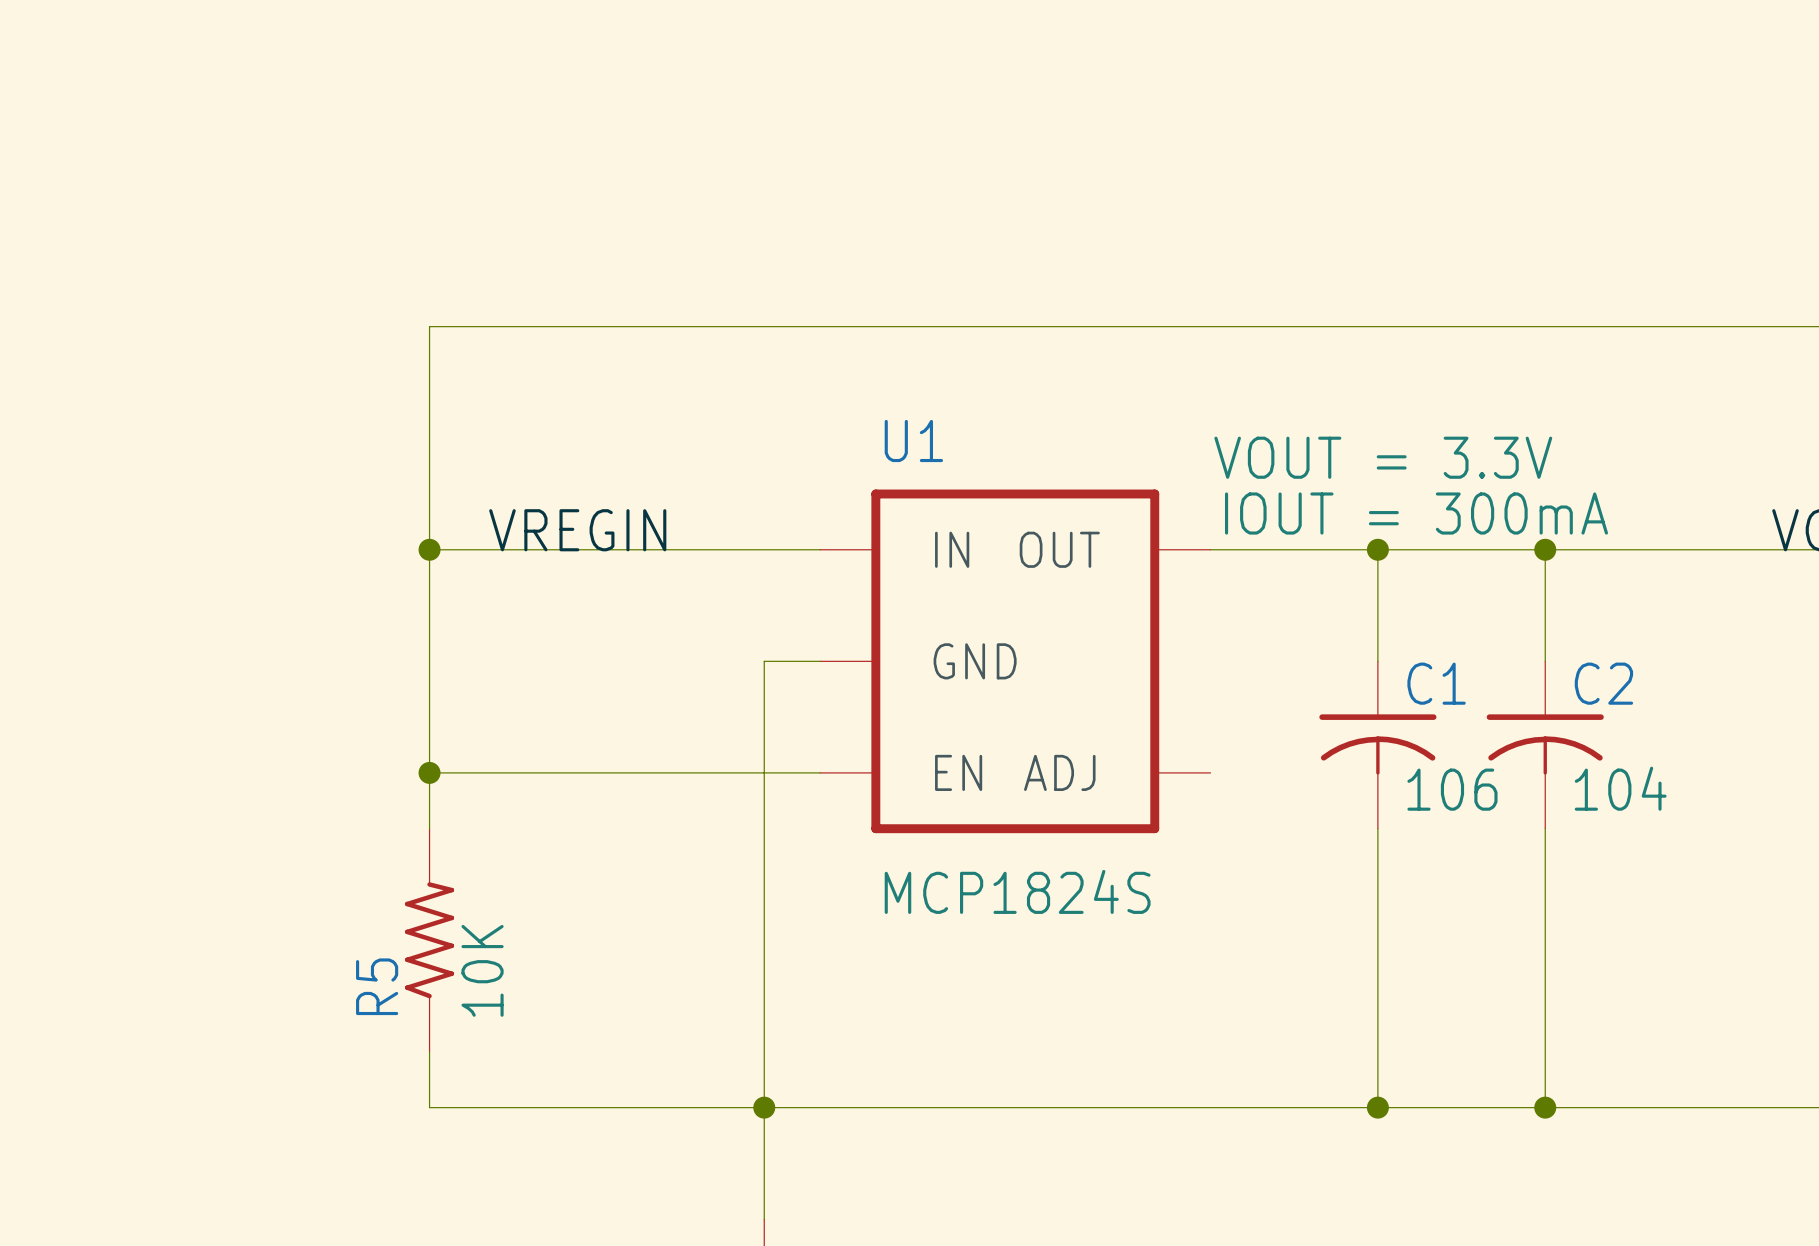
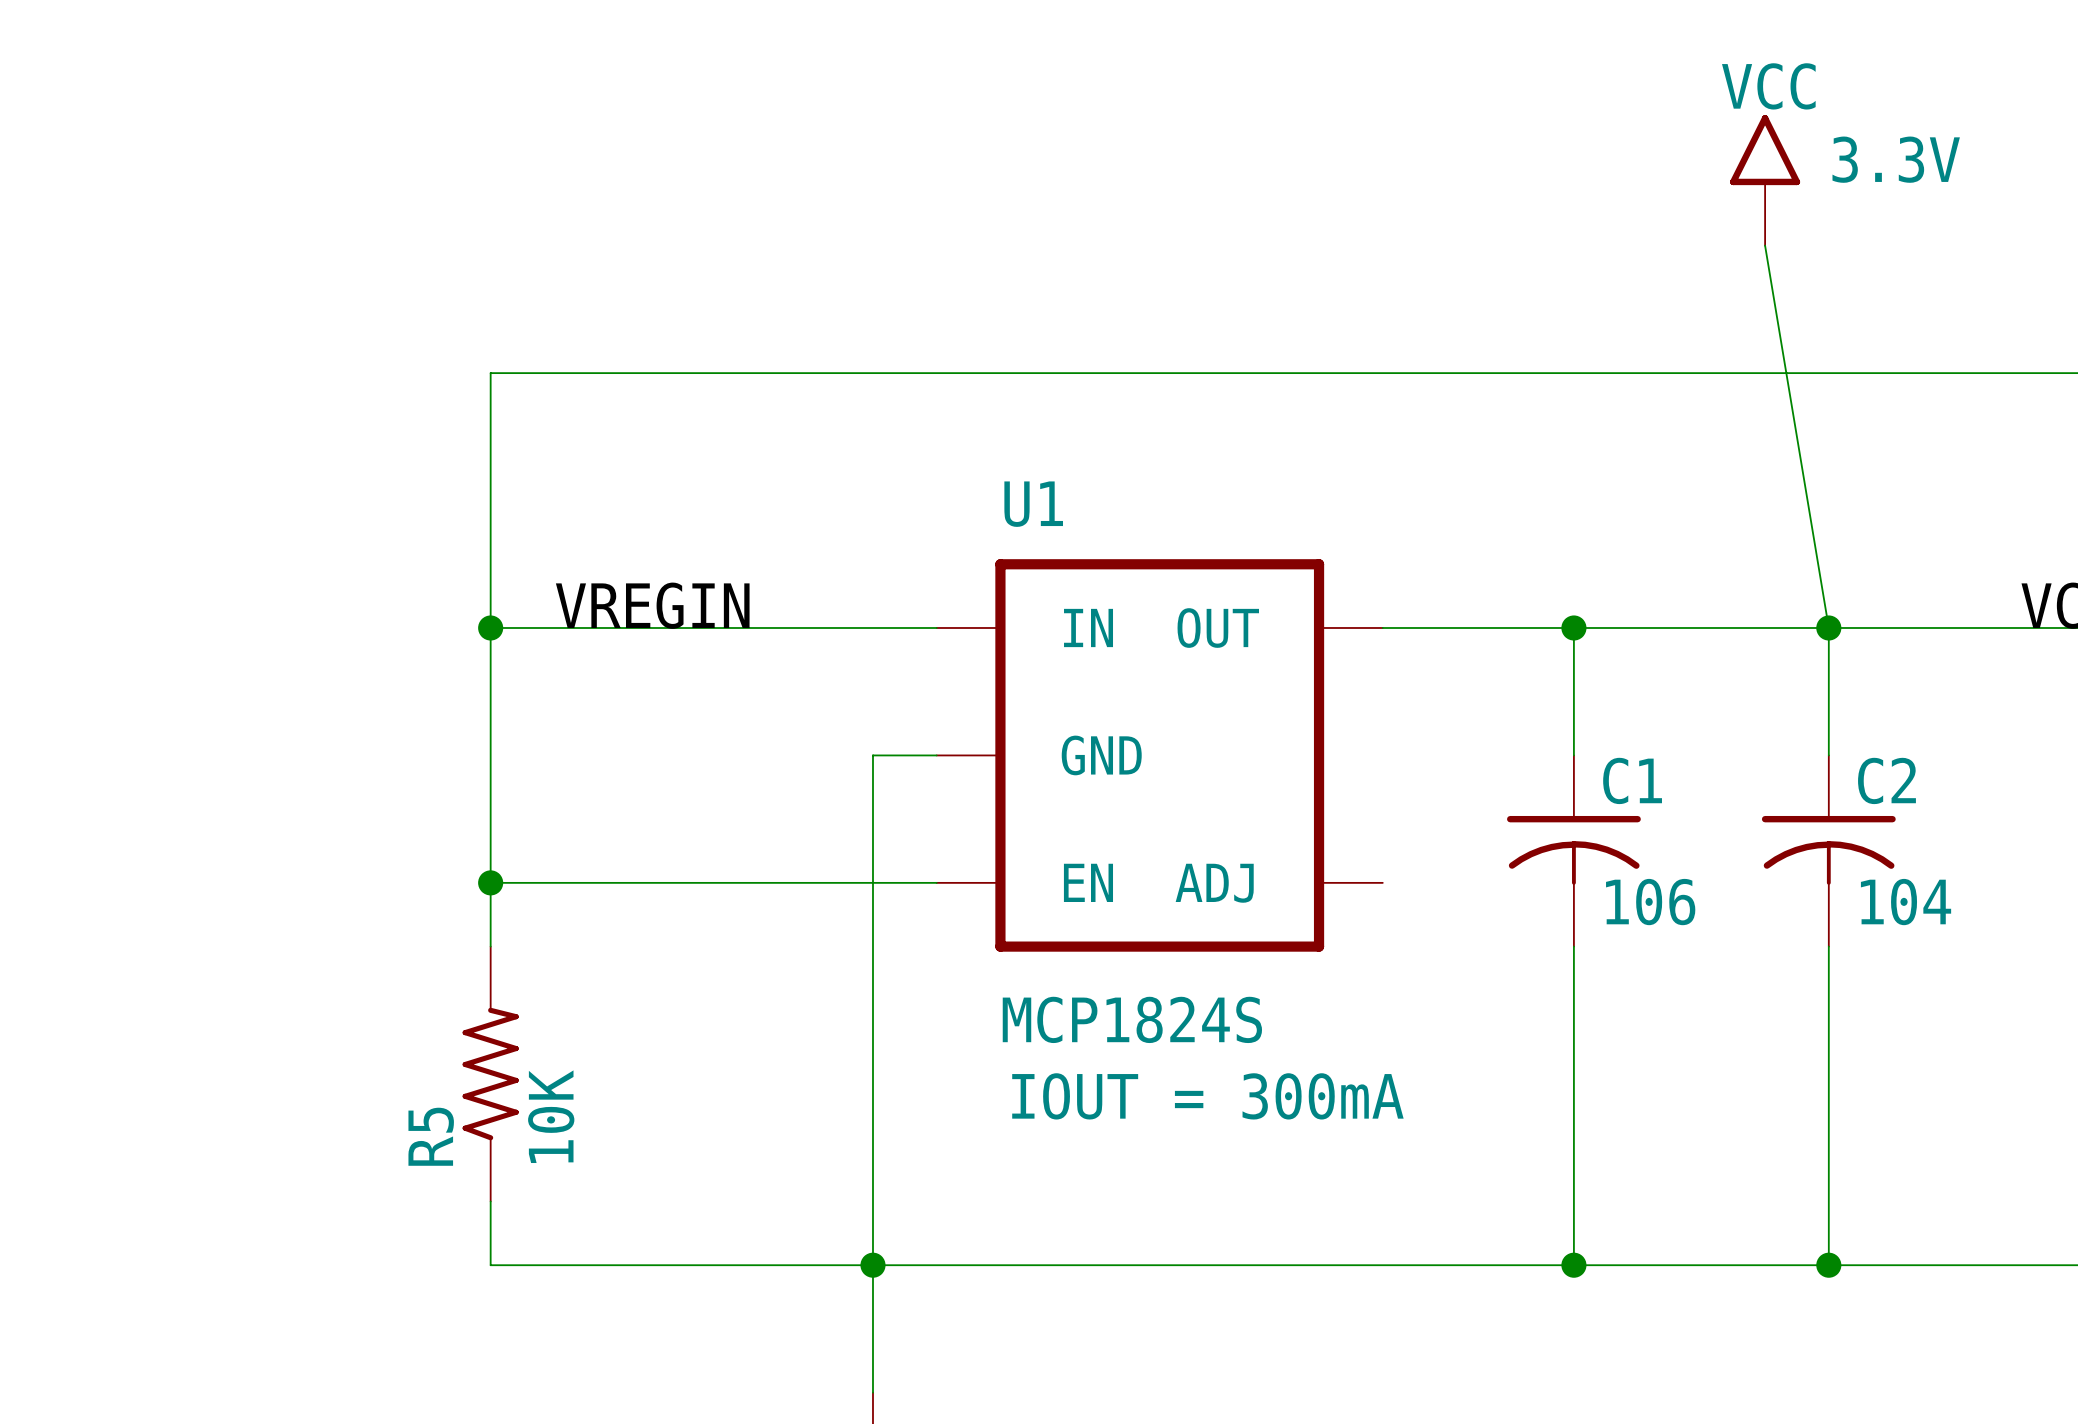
power symbol: none -> 3.3V (1765, 180)
wire: none -> (1765, 245) (1828, 627) (1828, 755)
U1 text: VOUT = 3.3V (1383, 457) -> none
U1 text position: IOUT = 300mA (1416, 513) -> IOUT = 300mA (1207, 1096)
wire: (1545, 549) (1545, 661) -> none
junction position: (1545, 549) -> (1828, 627)
C2 position: (1545, 745) -> (1828, 851)
wire: (1545, 828) (1545, 1107) -> (1828, 946) (1828, 1265)
junction position: (1545, 1107) -> (1828, 1265)

